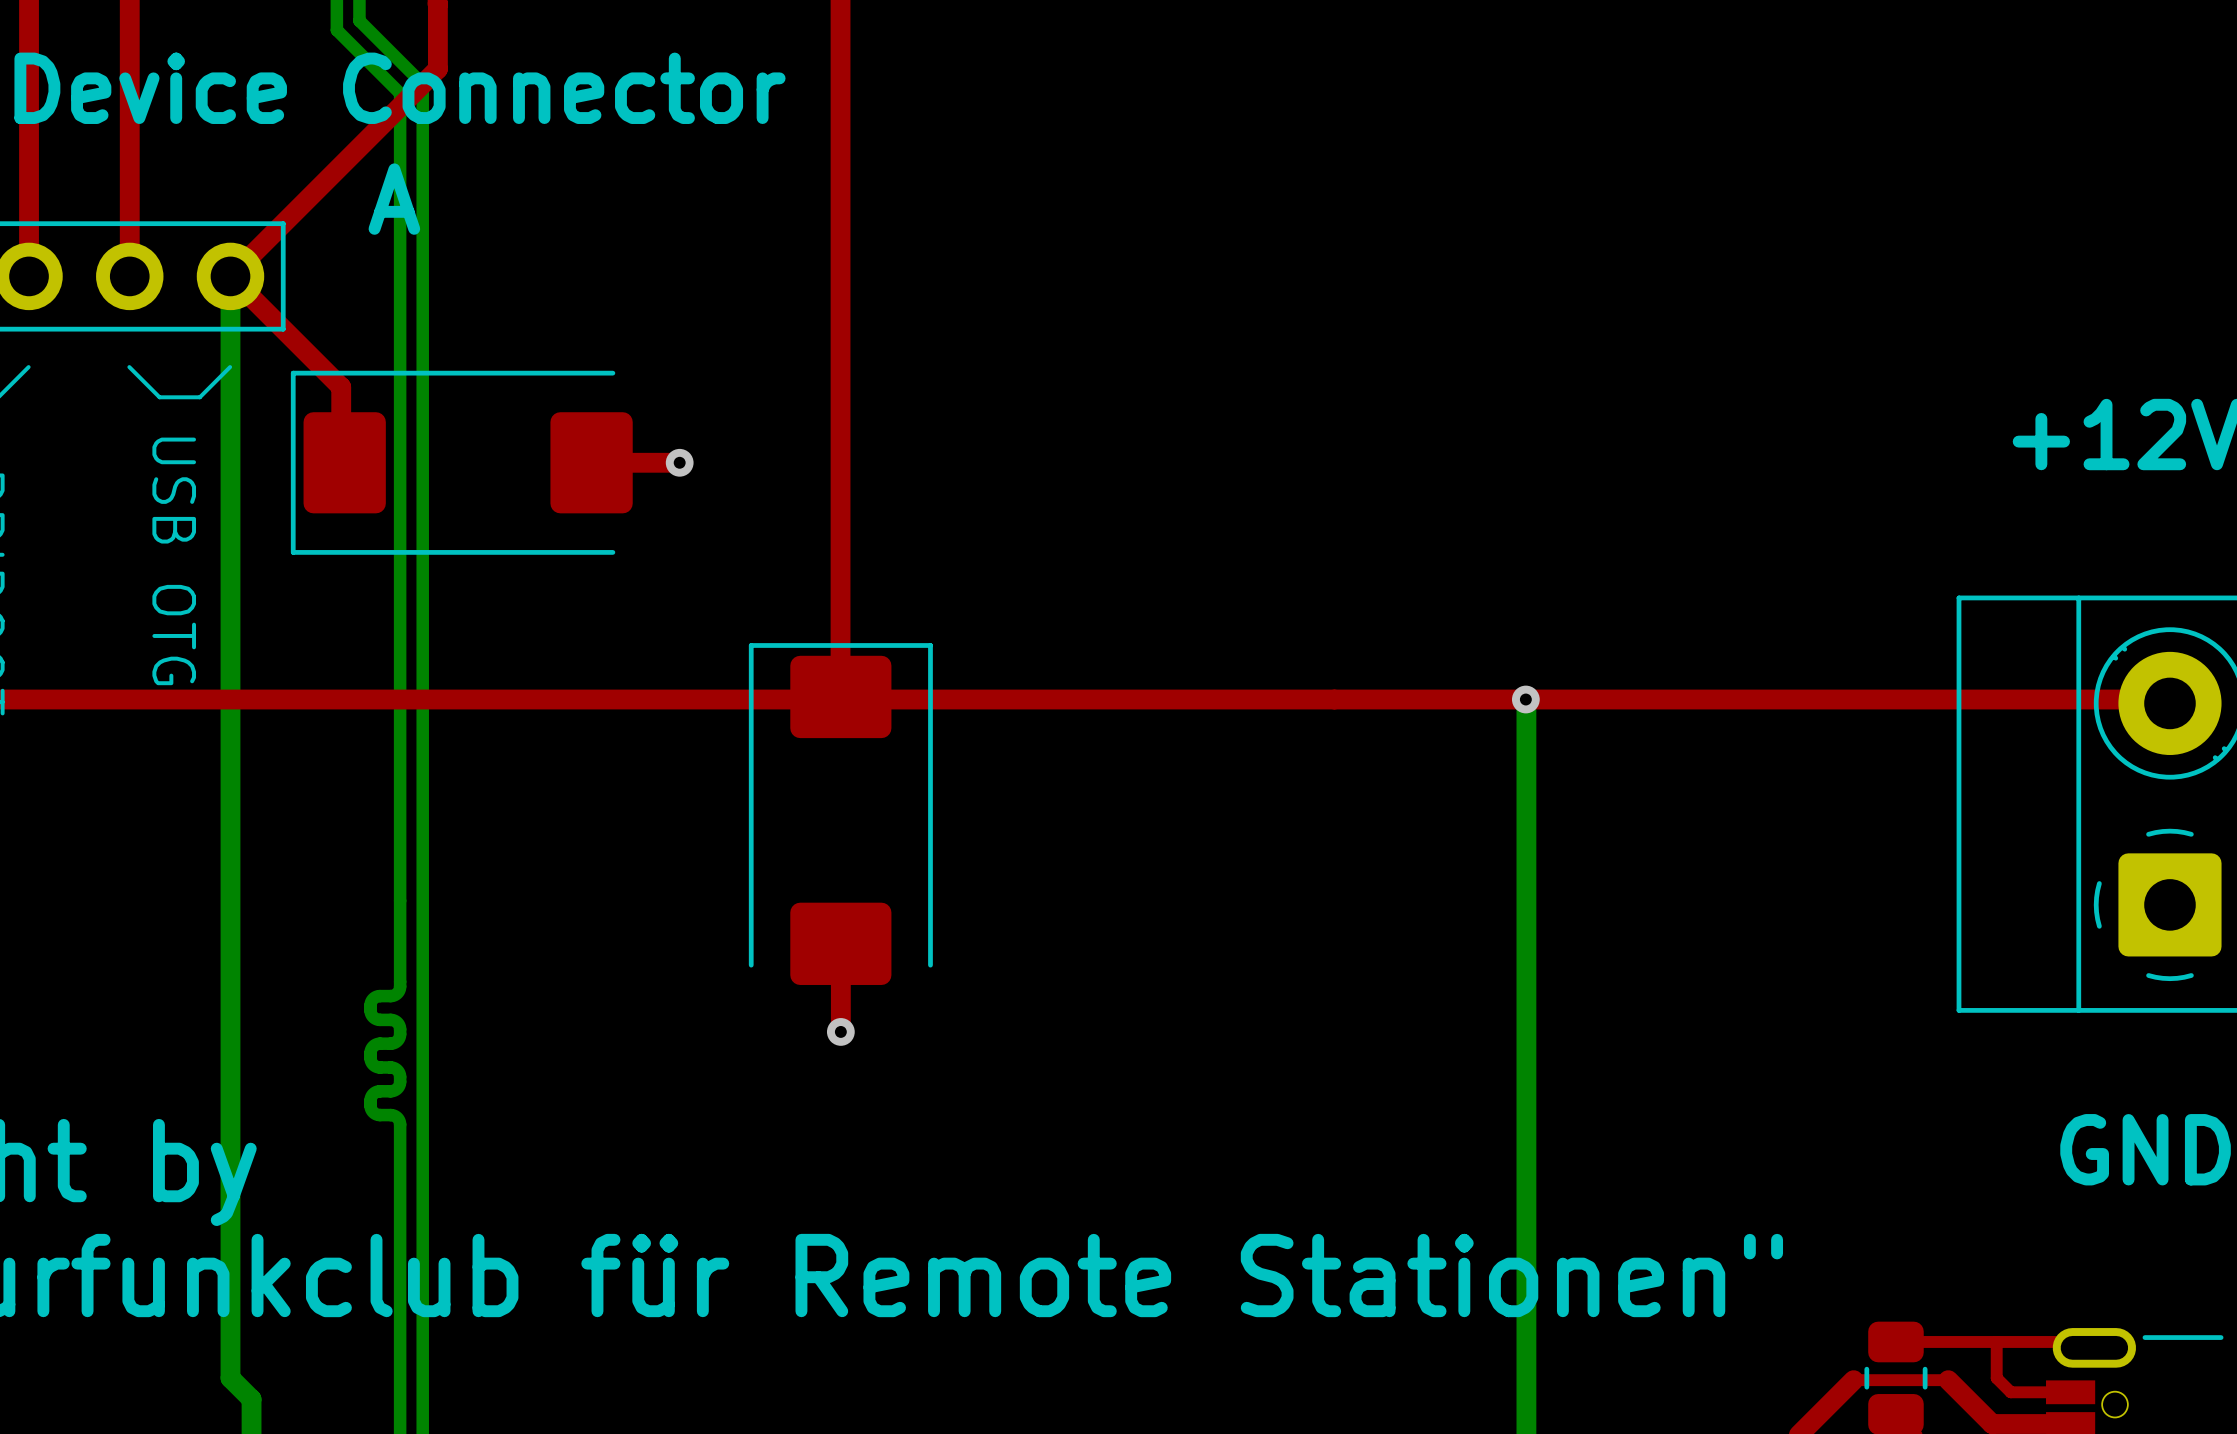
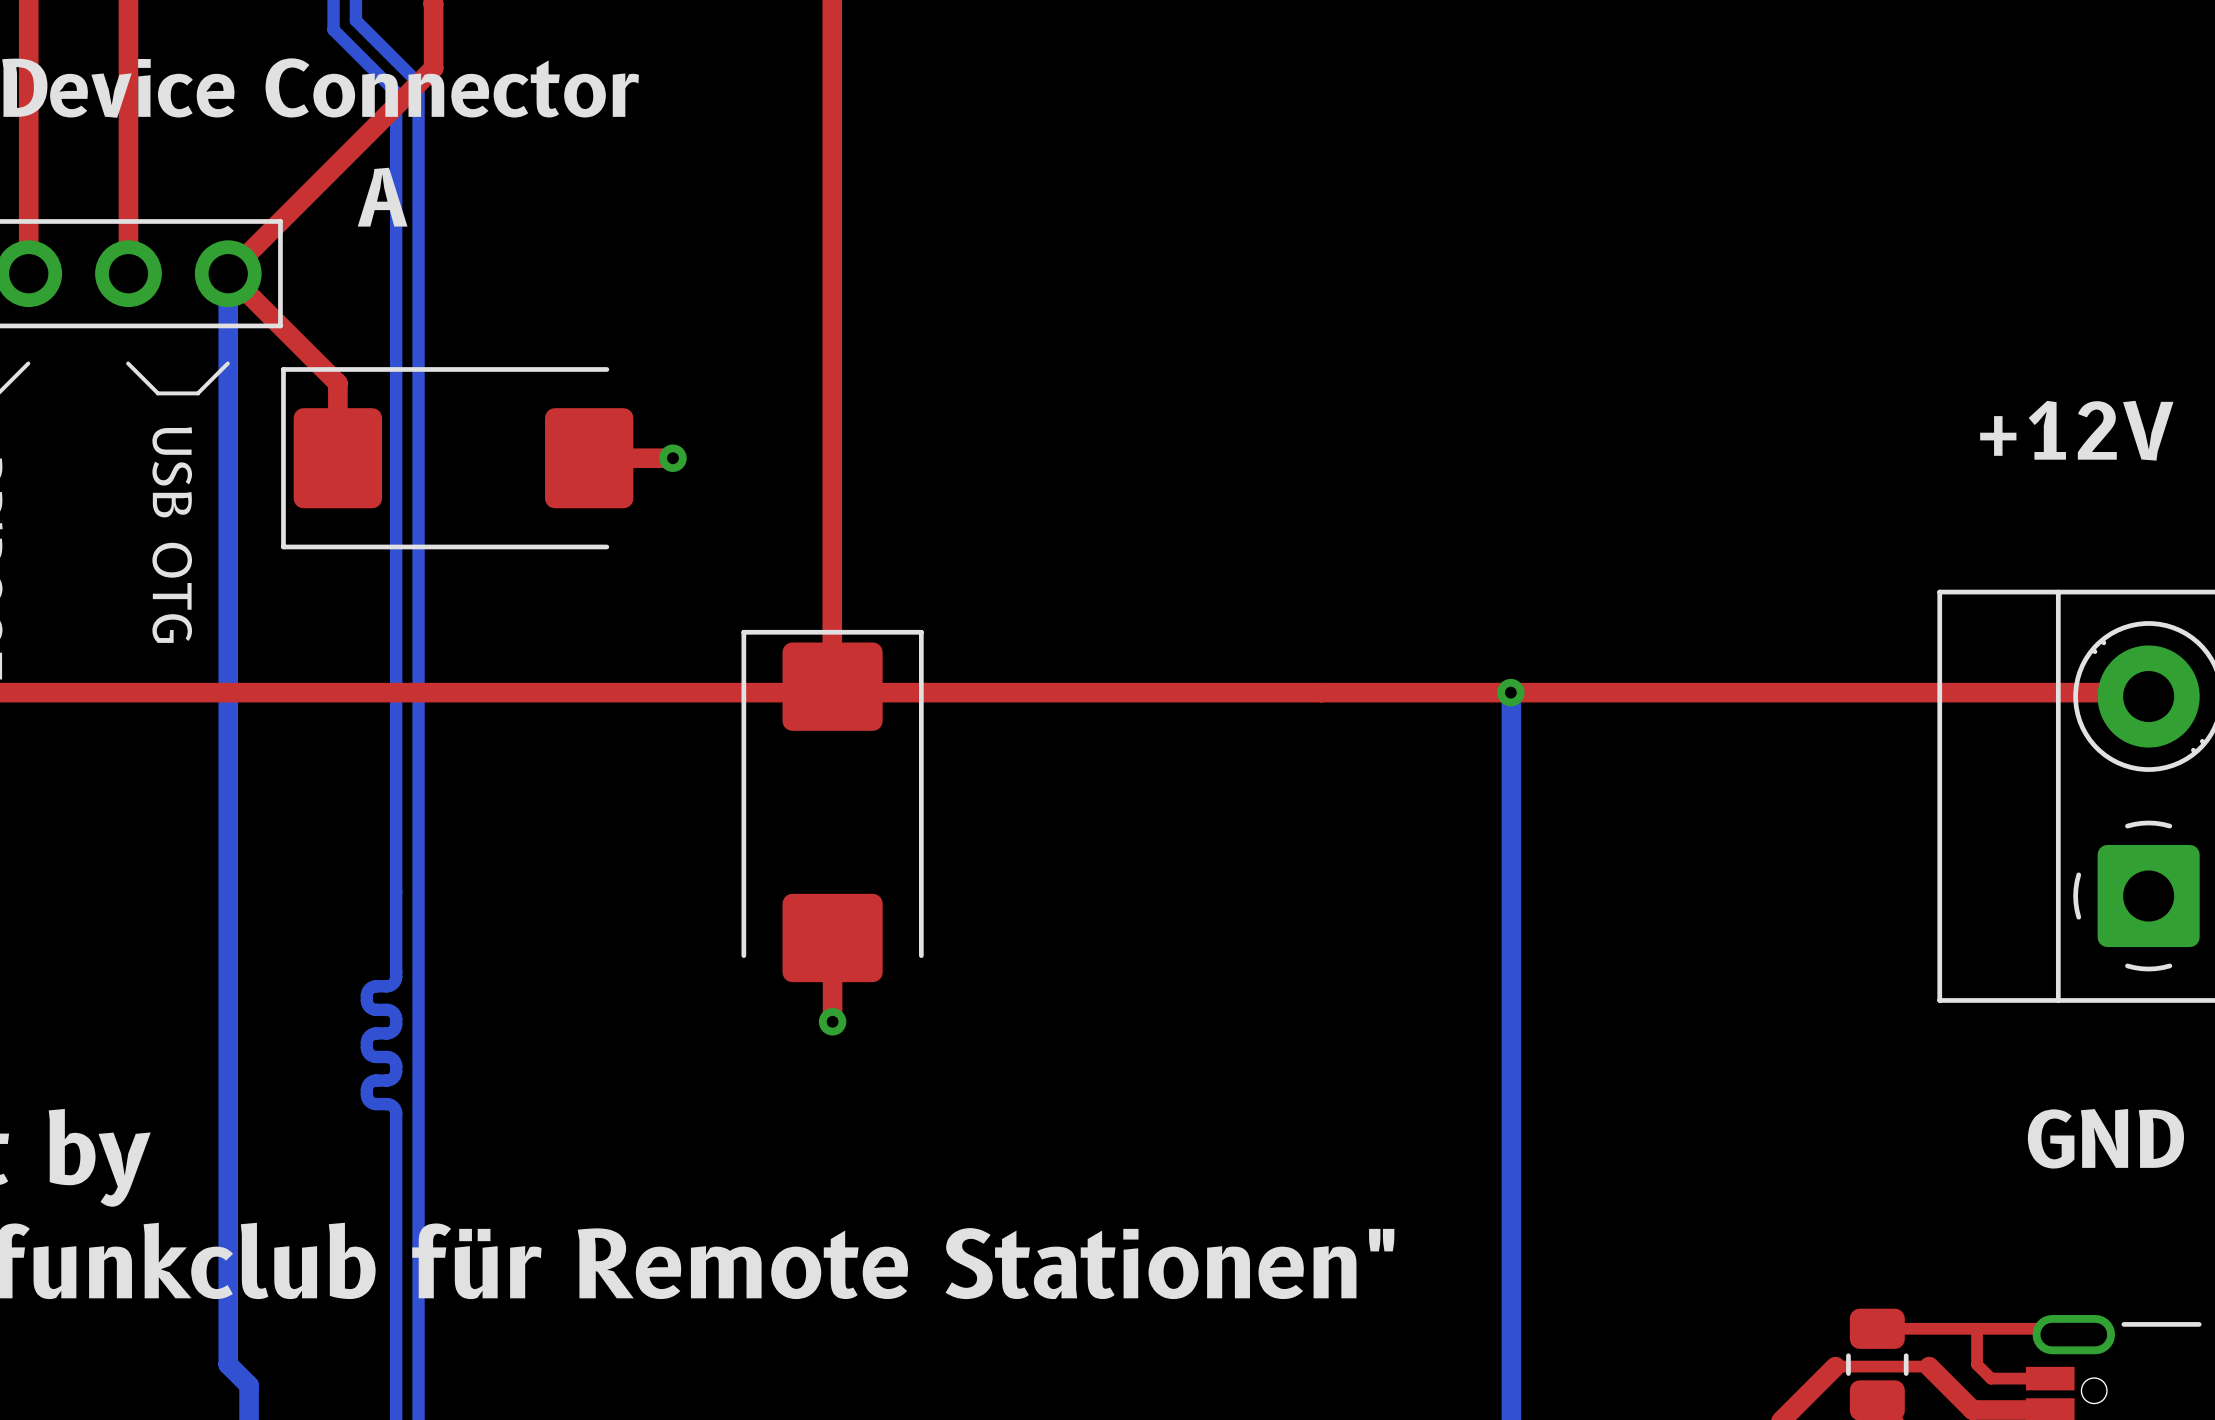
part footprint: [290, 370, 633, 555] -> [281, 367, 634, 550]
part footprint: [748, 643, 933, 985] -> [741, 629, 924, 983]

